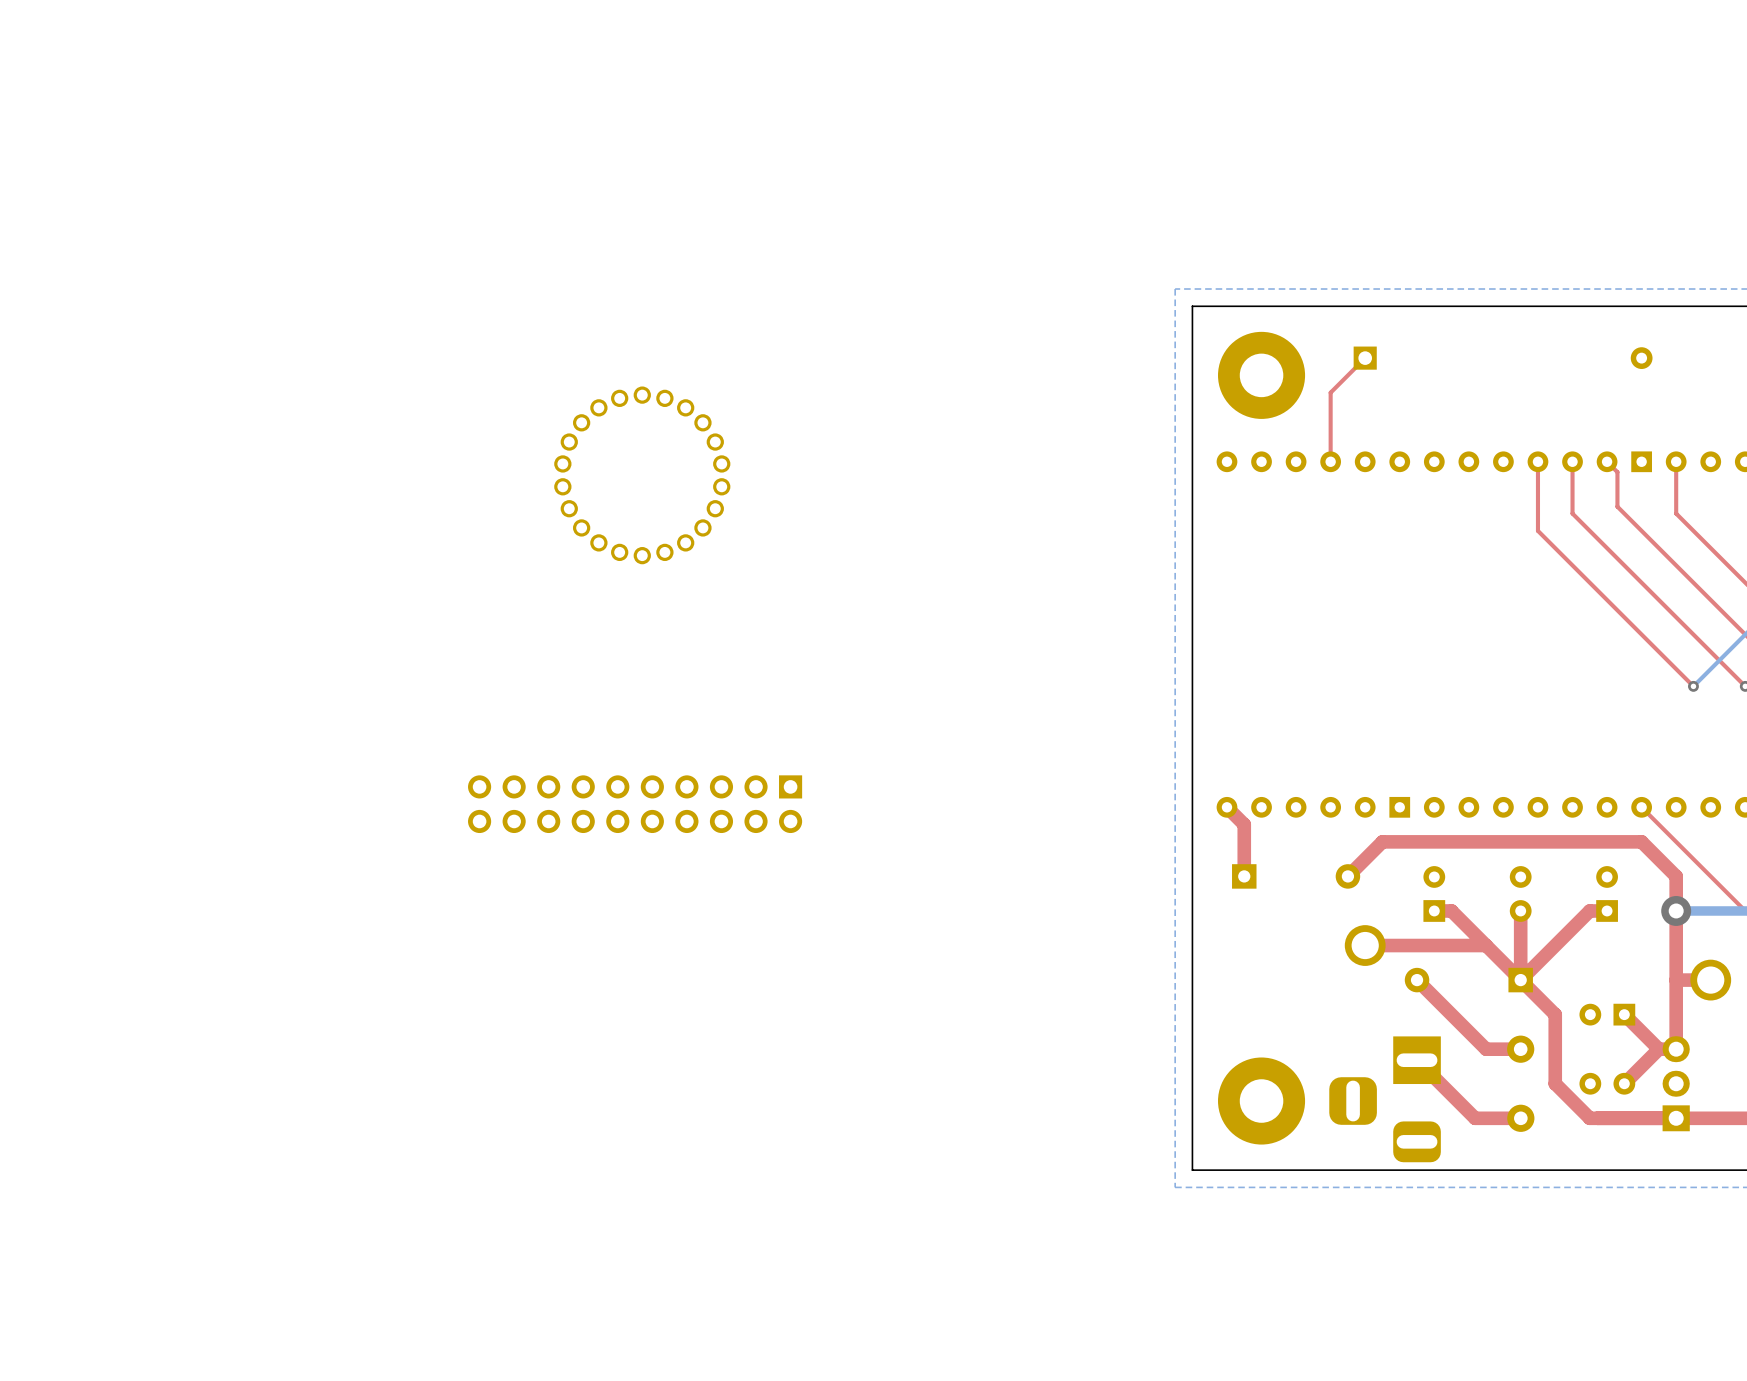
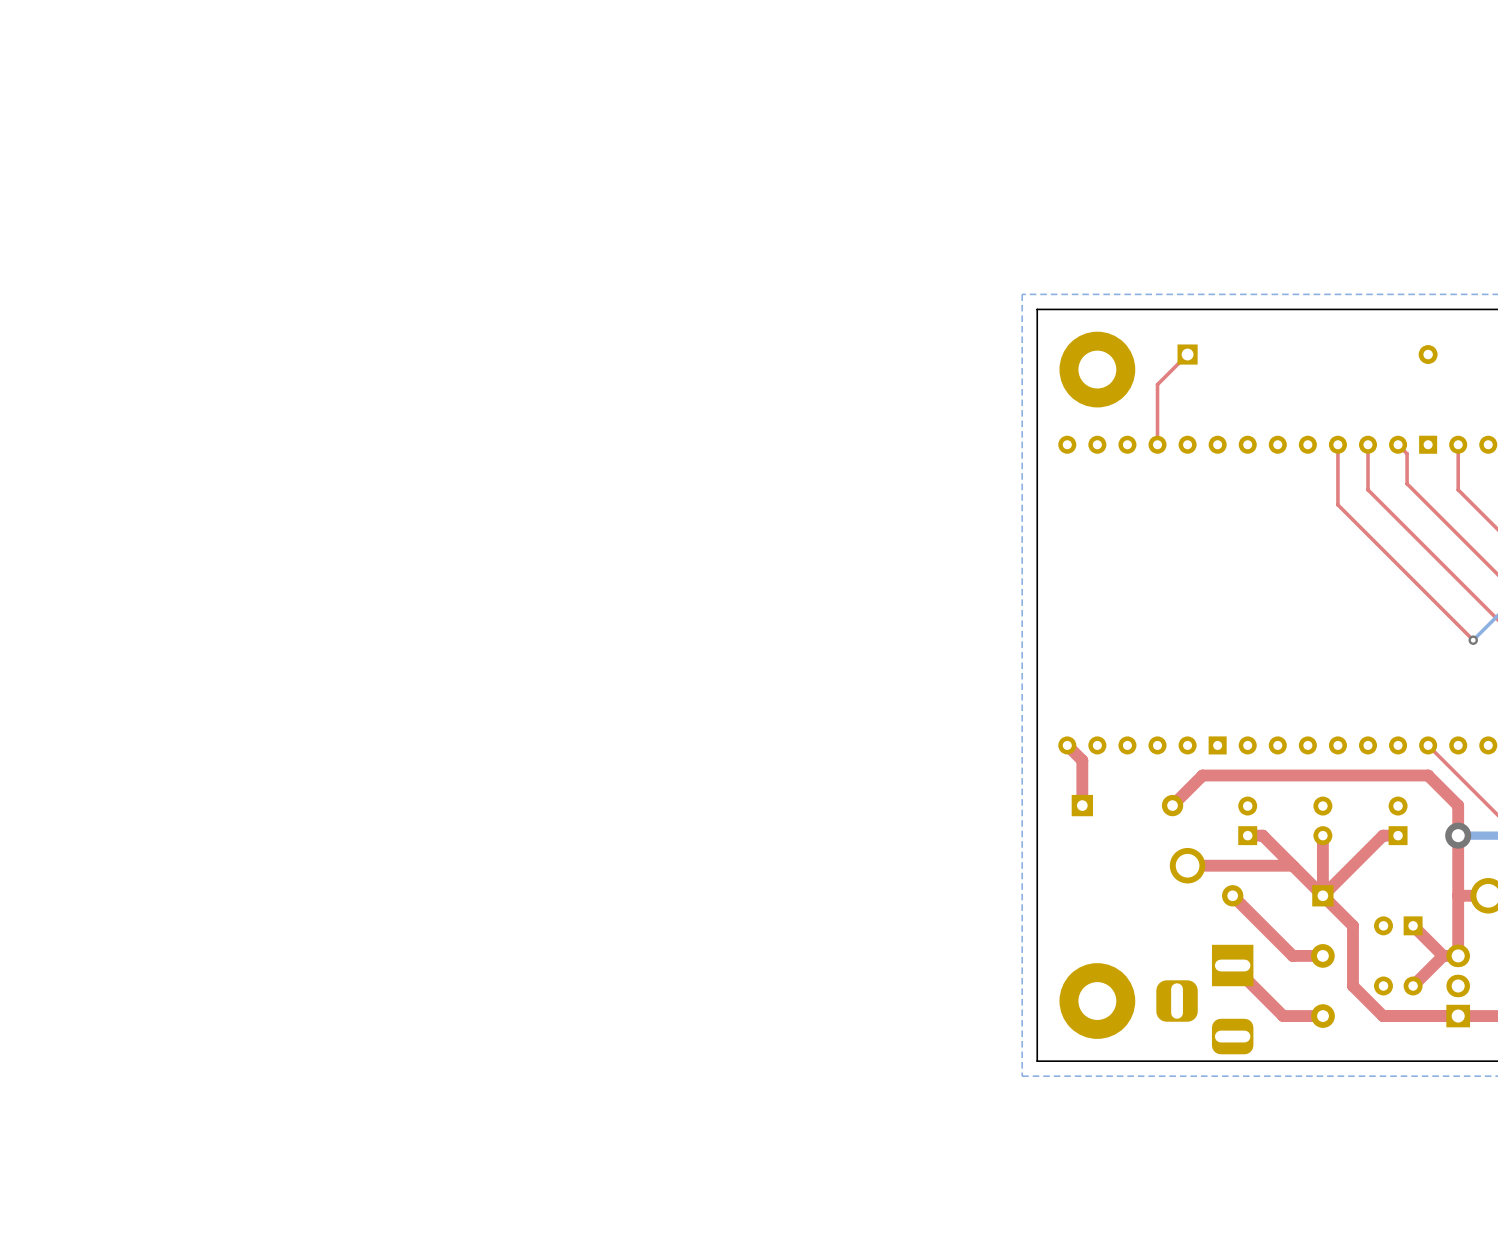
part: (642, 475) -> none
part: (635, 804) -> none

